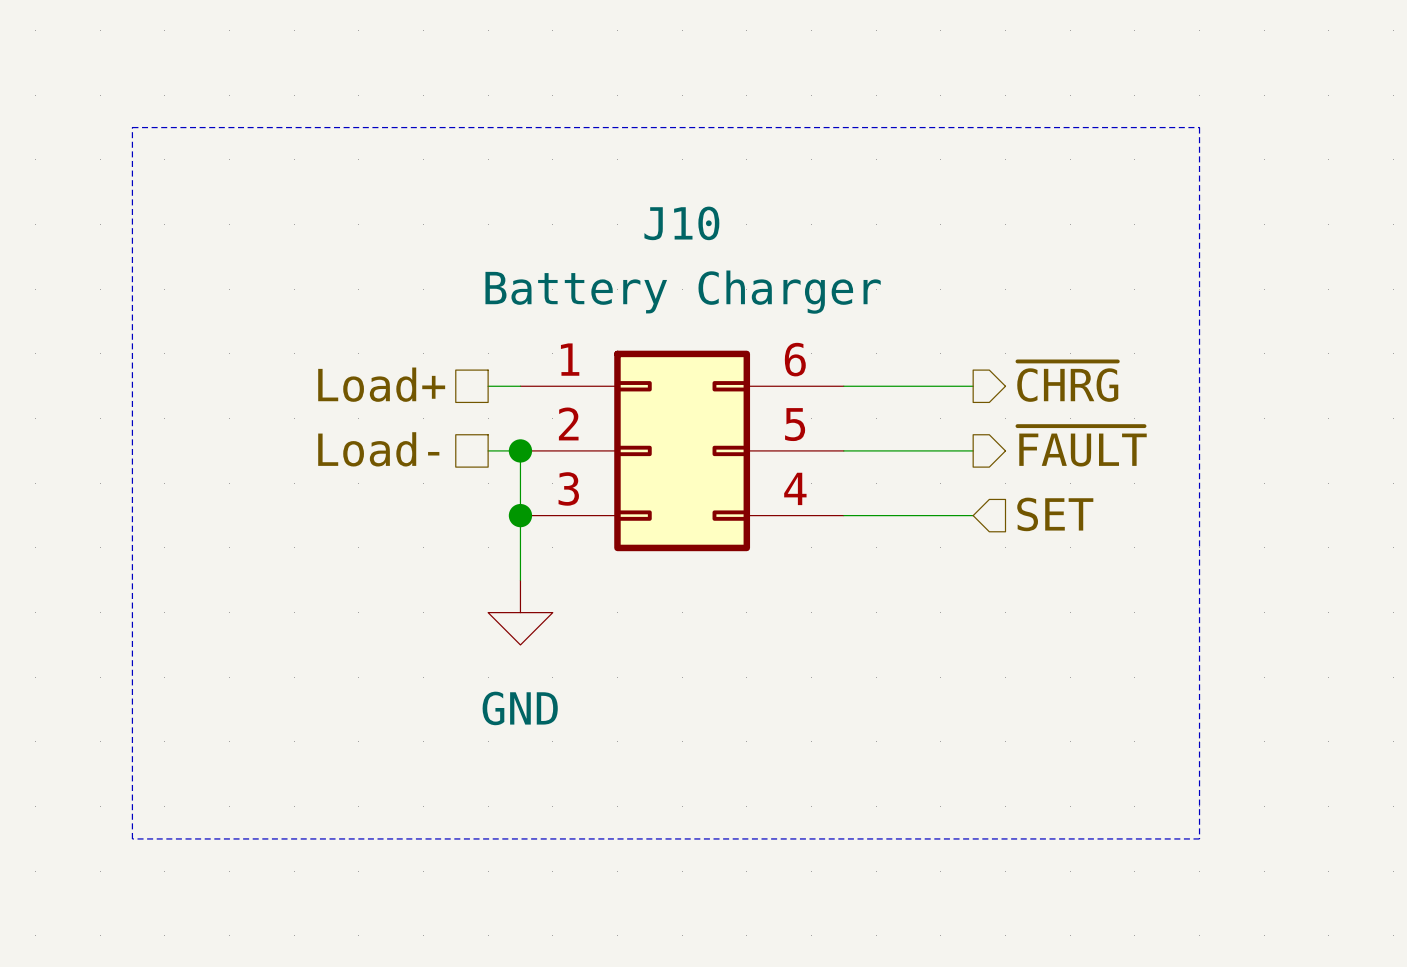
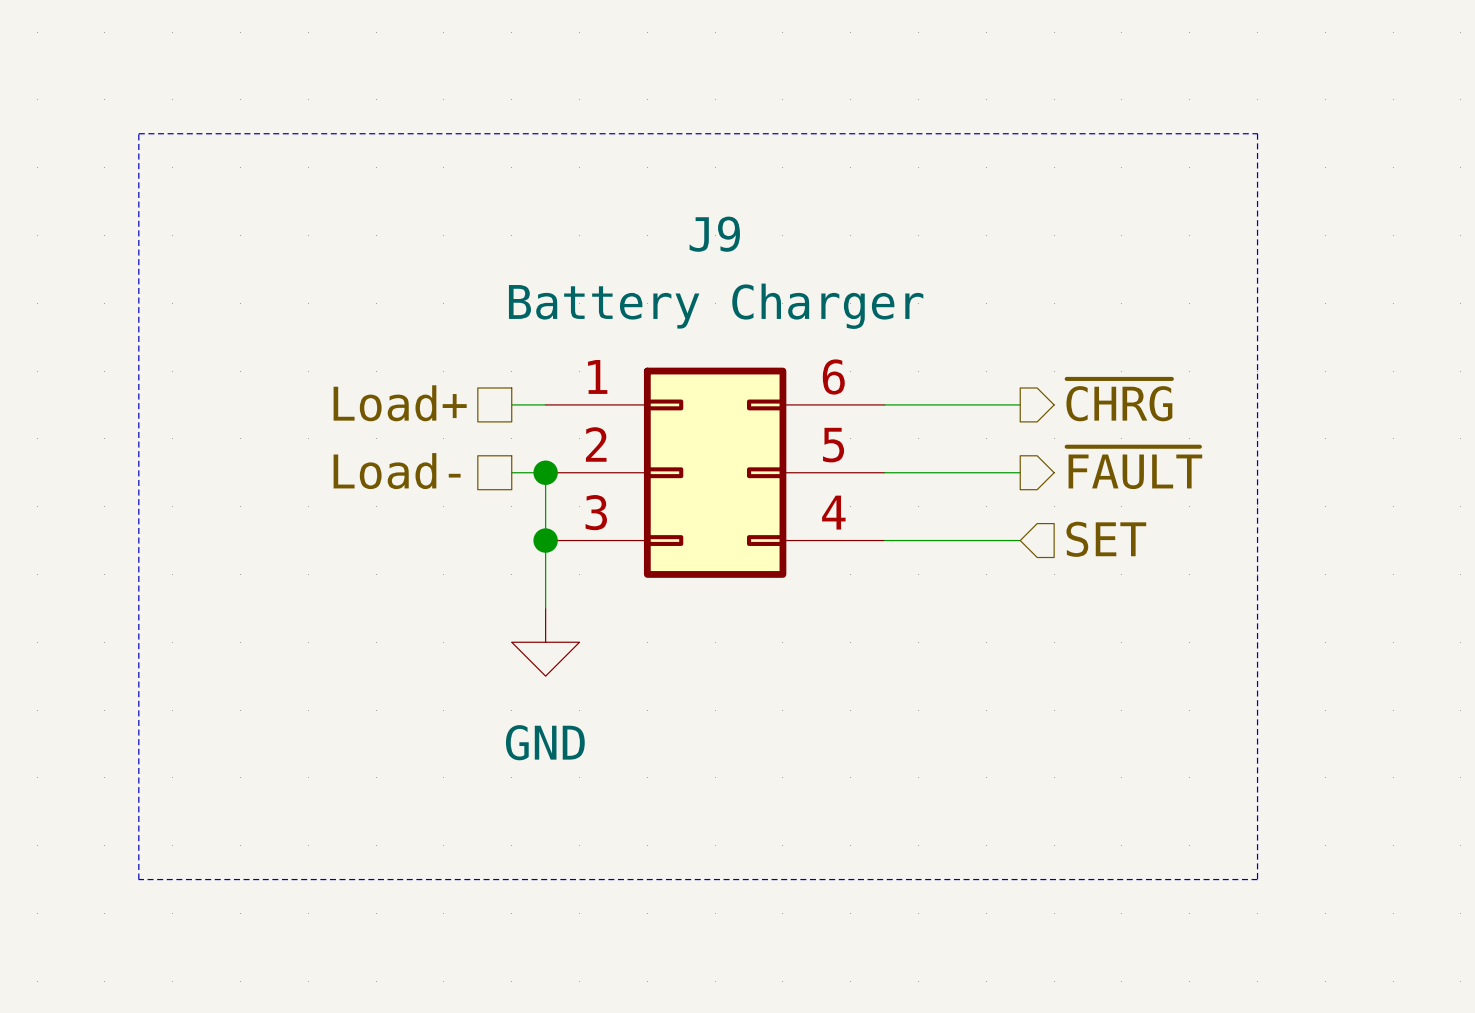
J10 name: J10 (681, 223) -> J9 (714, 234)

